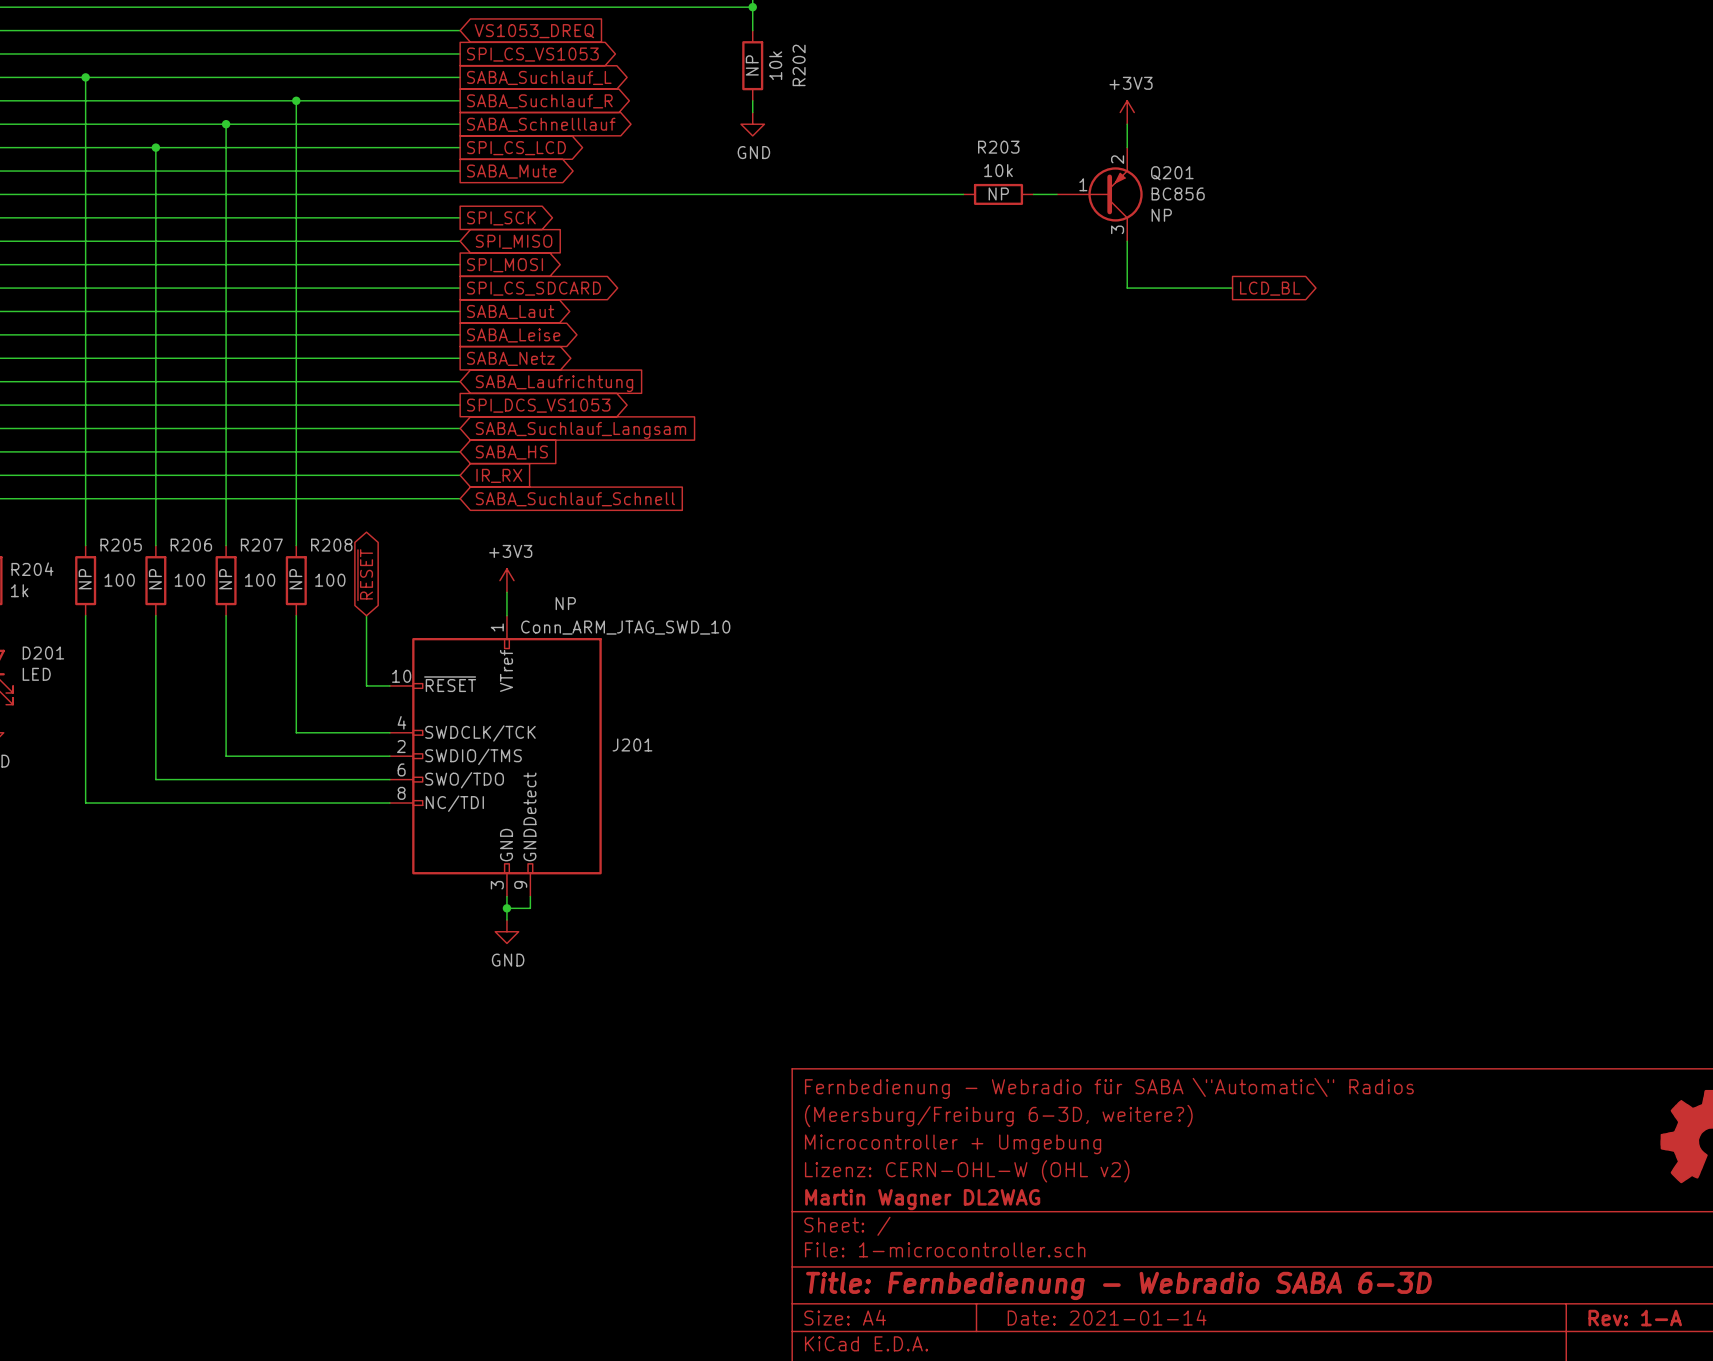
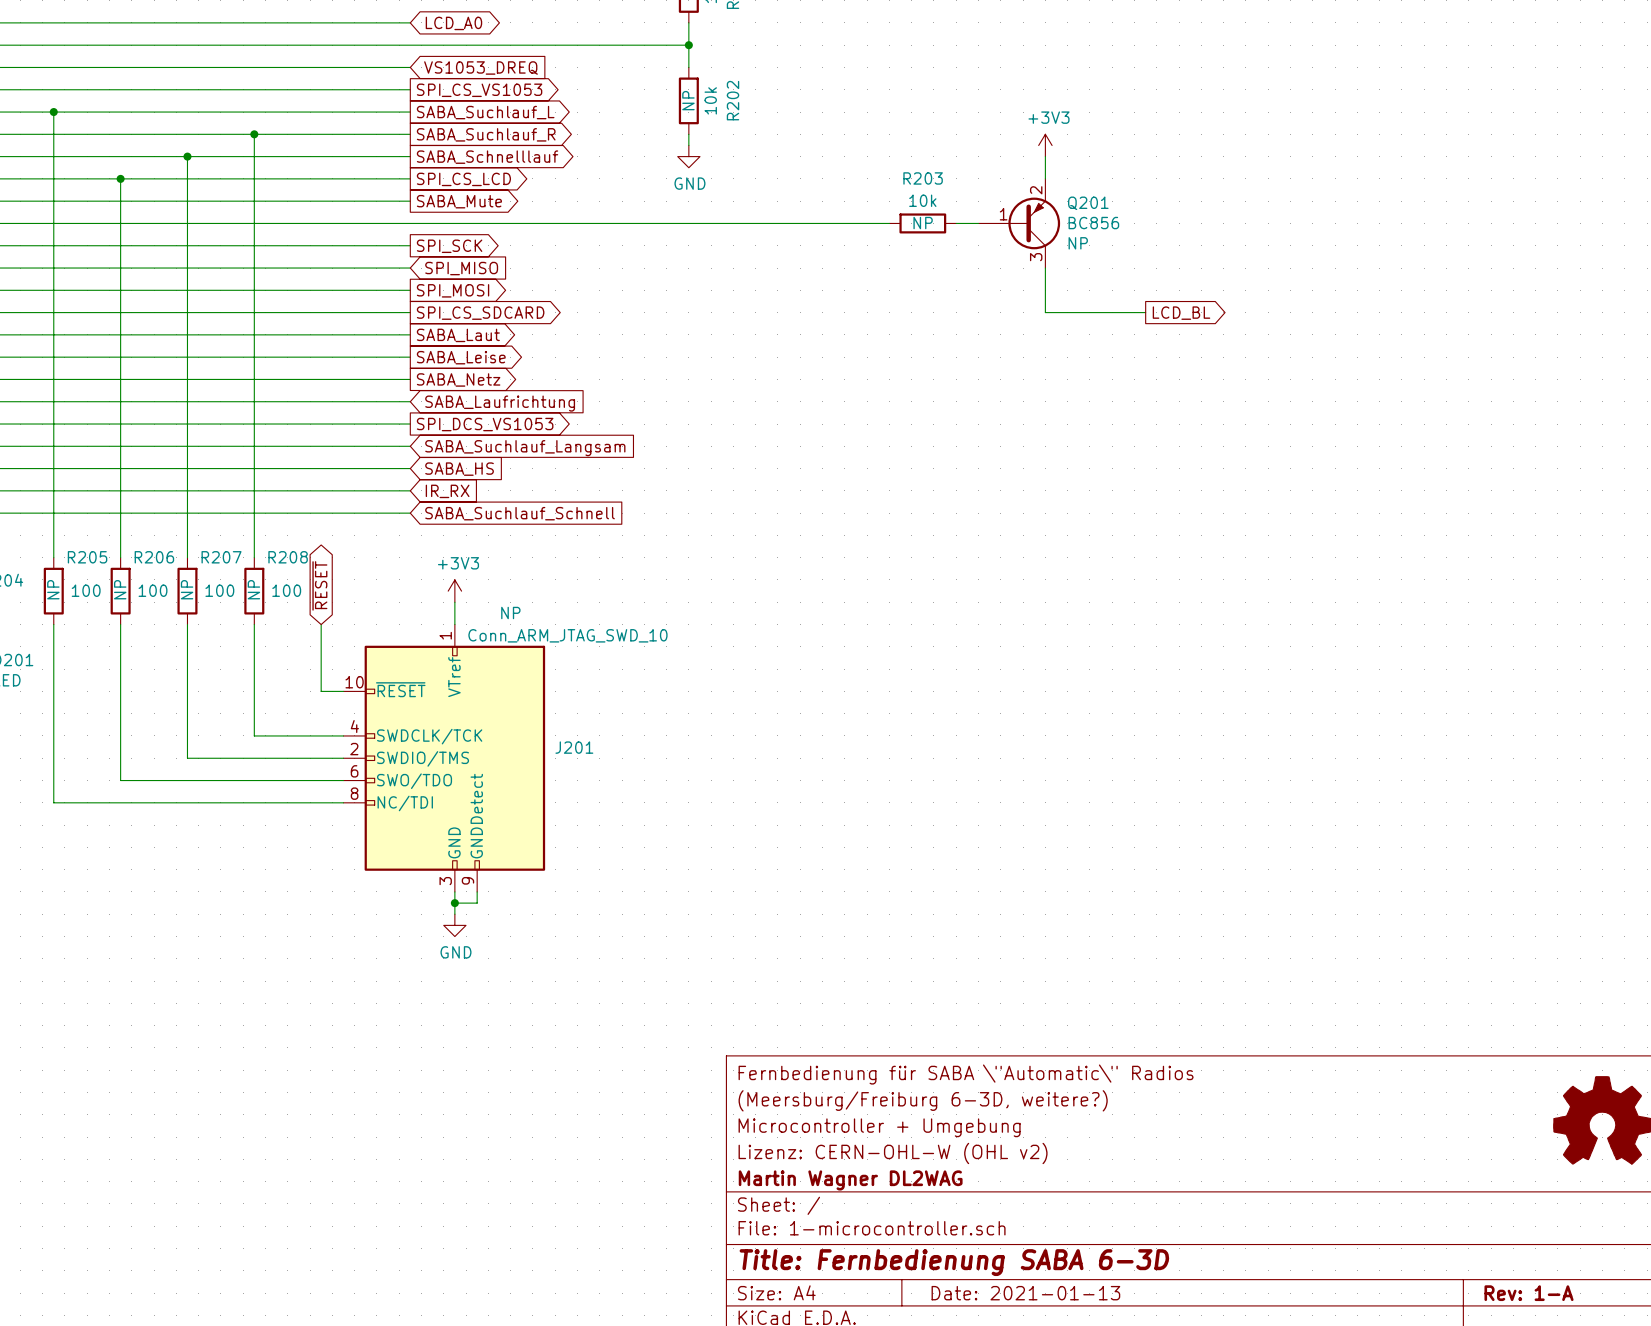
title block: Fernbedienung - Webradio für SABA \"Automatic\" Radios (1109, 1088) -> Fernbedienung für SABA \"Automatic\" Radios (966, 1074)
title block: Title: Fernbedienung - Webradio SABA 6-3D (1118, 1285) -> Title: Fernbedienung SABA 6-3D (954, 1262)
title block: Date: 2021-01-14 (1107, 1317) -> Date: 2021-01-13 (1025, 1293)

